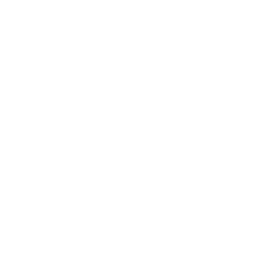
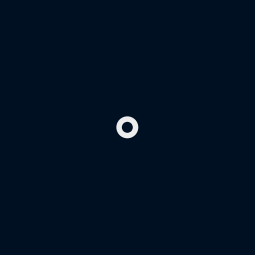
via: none -> (127, 127)

